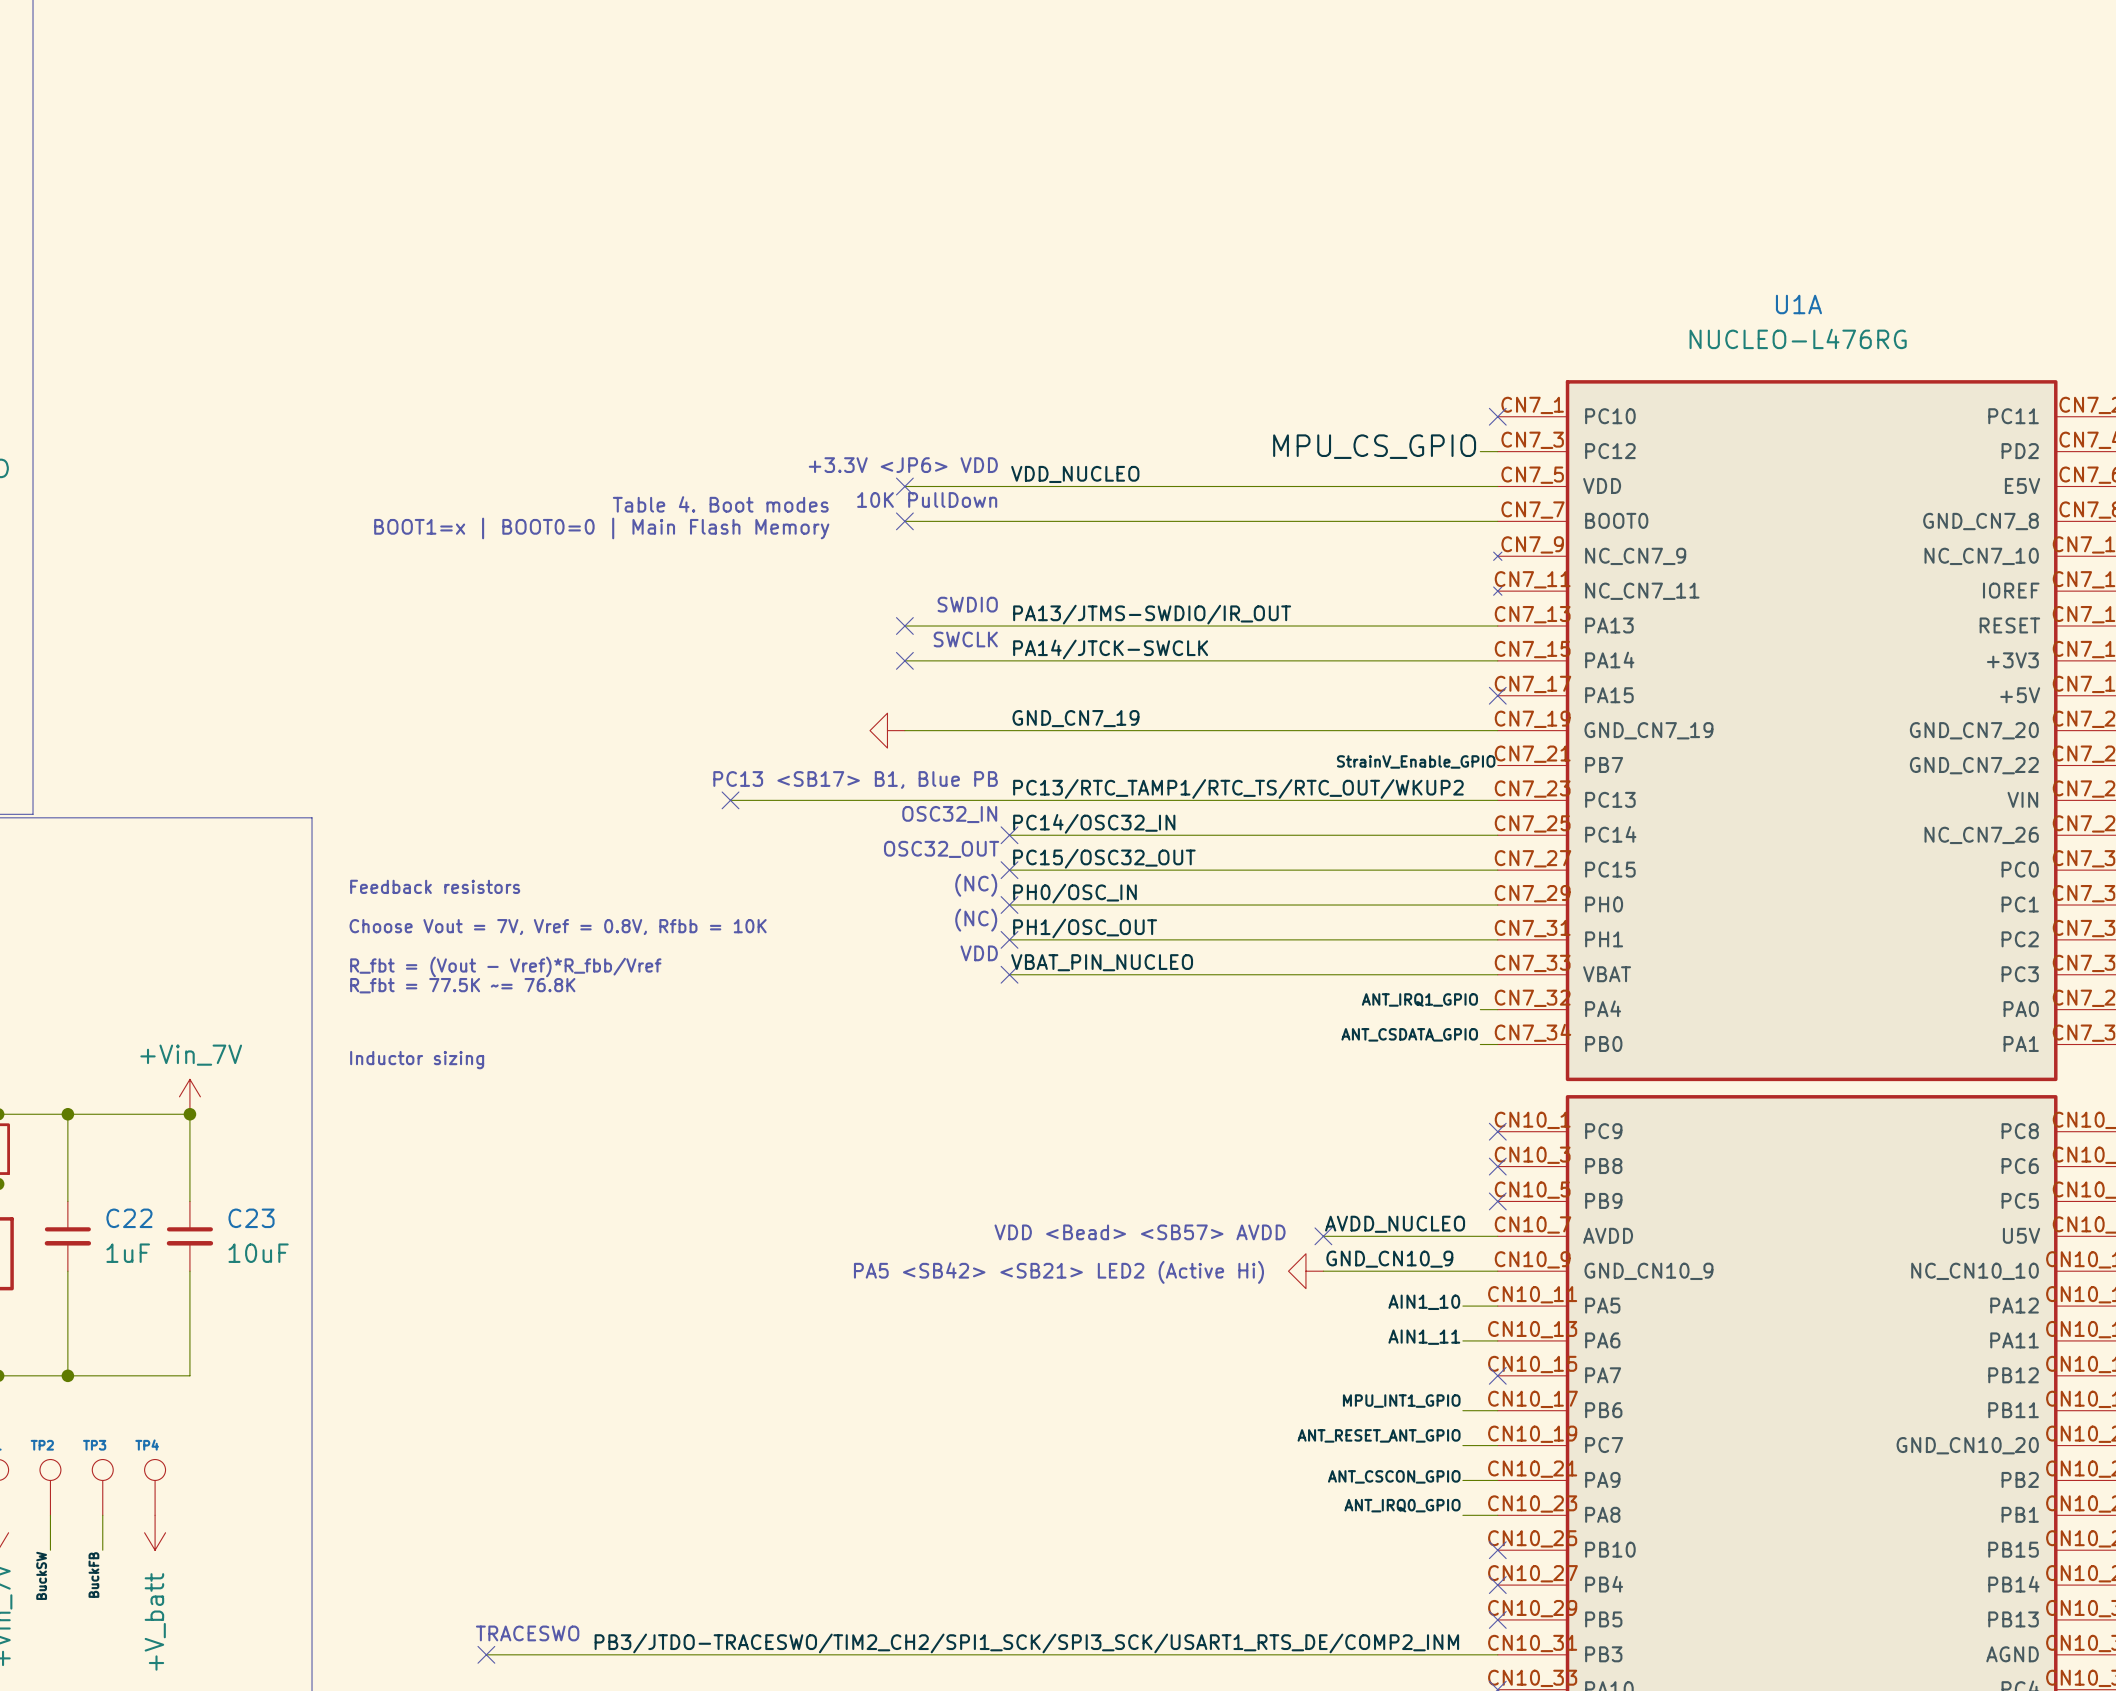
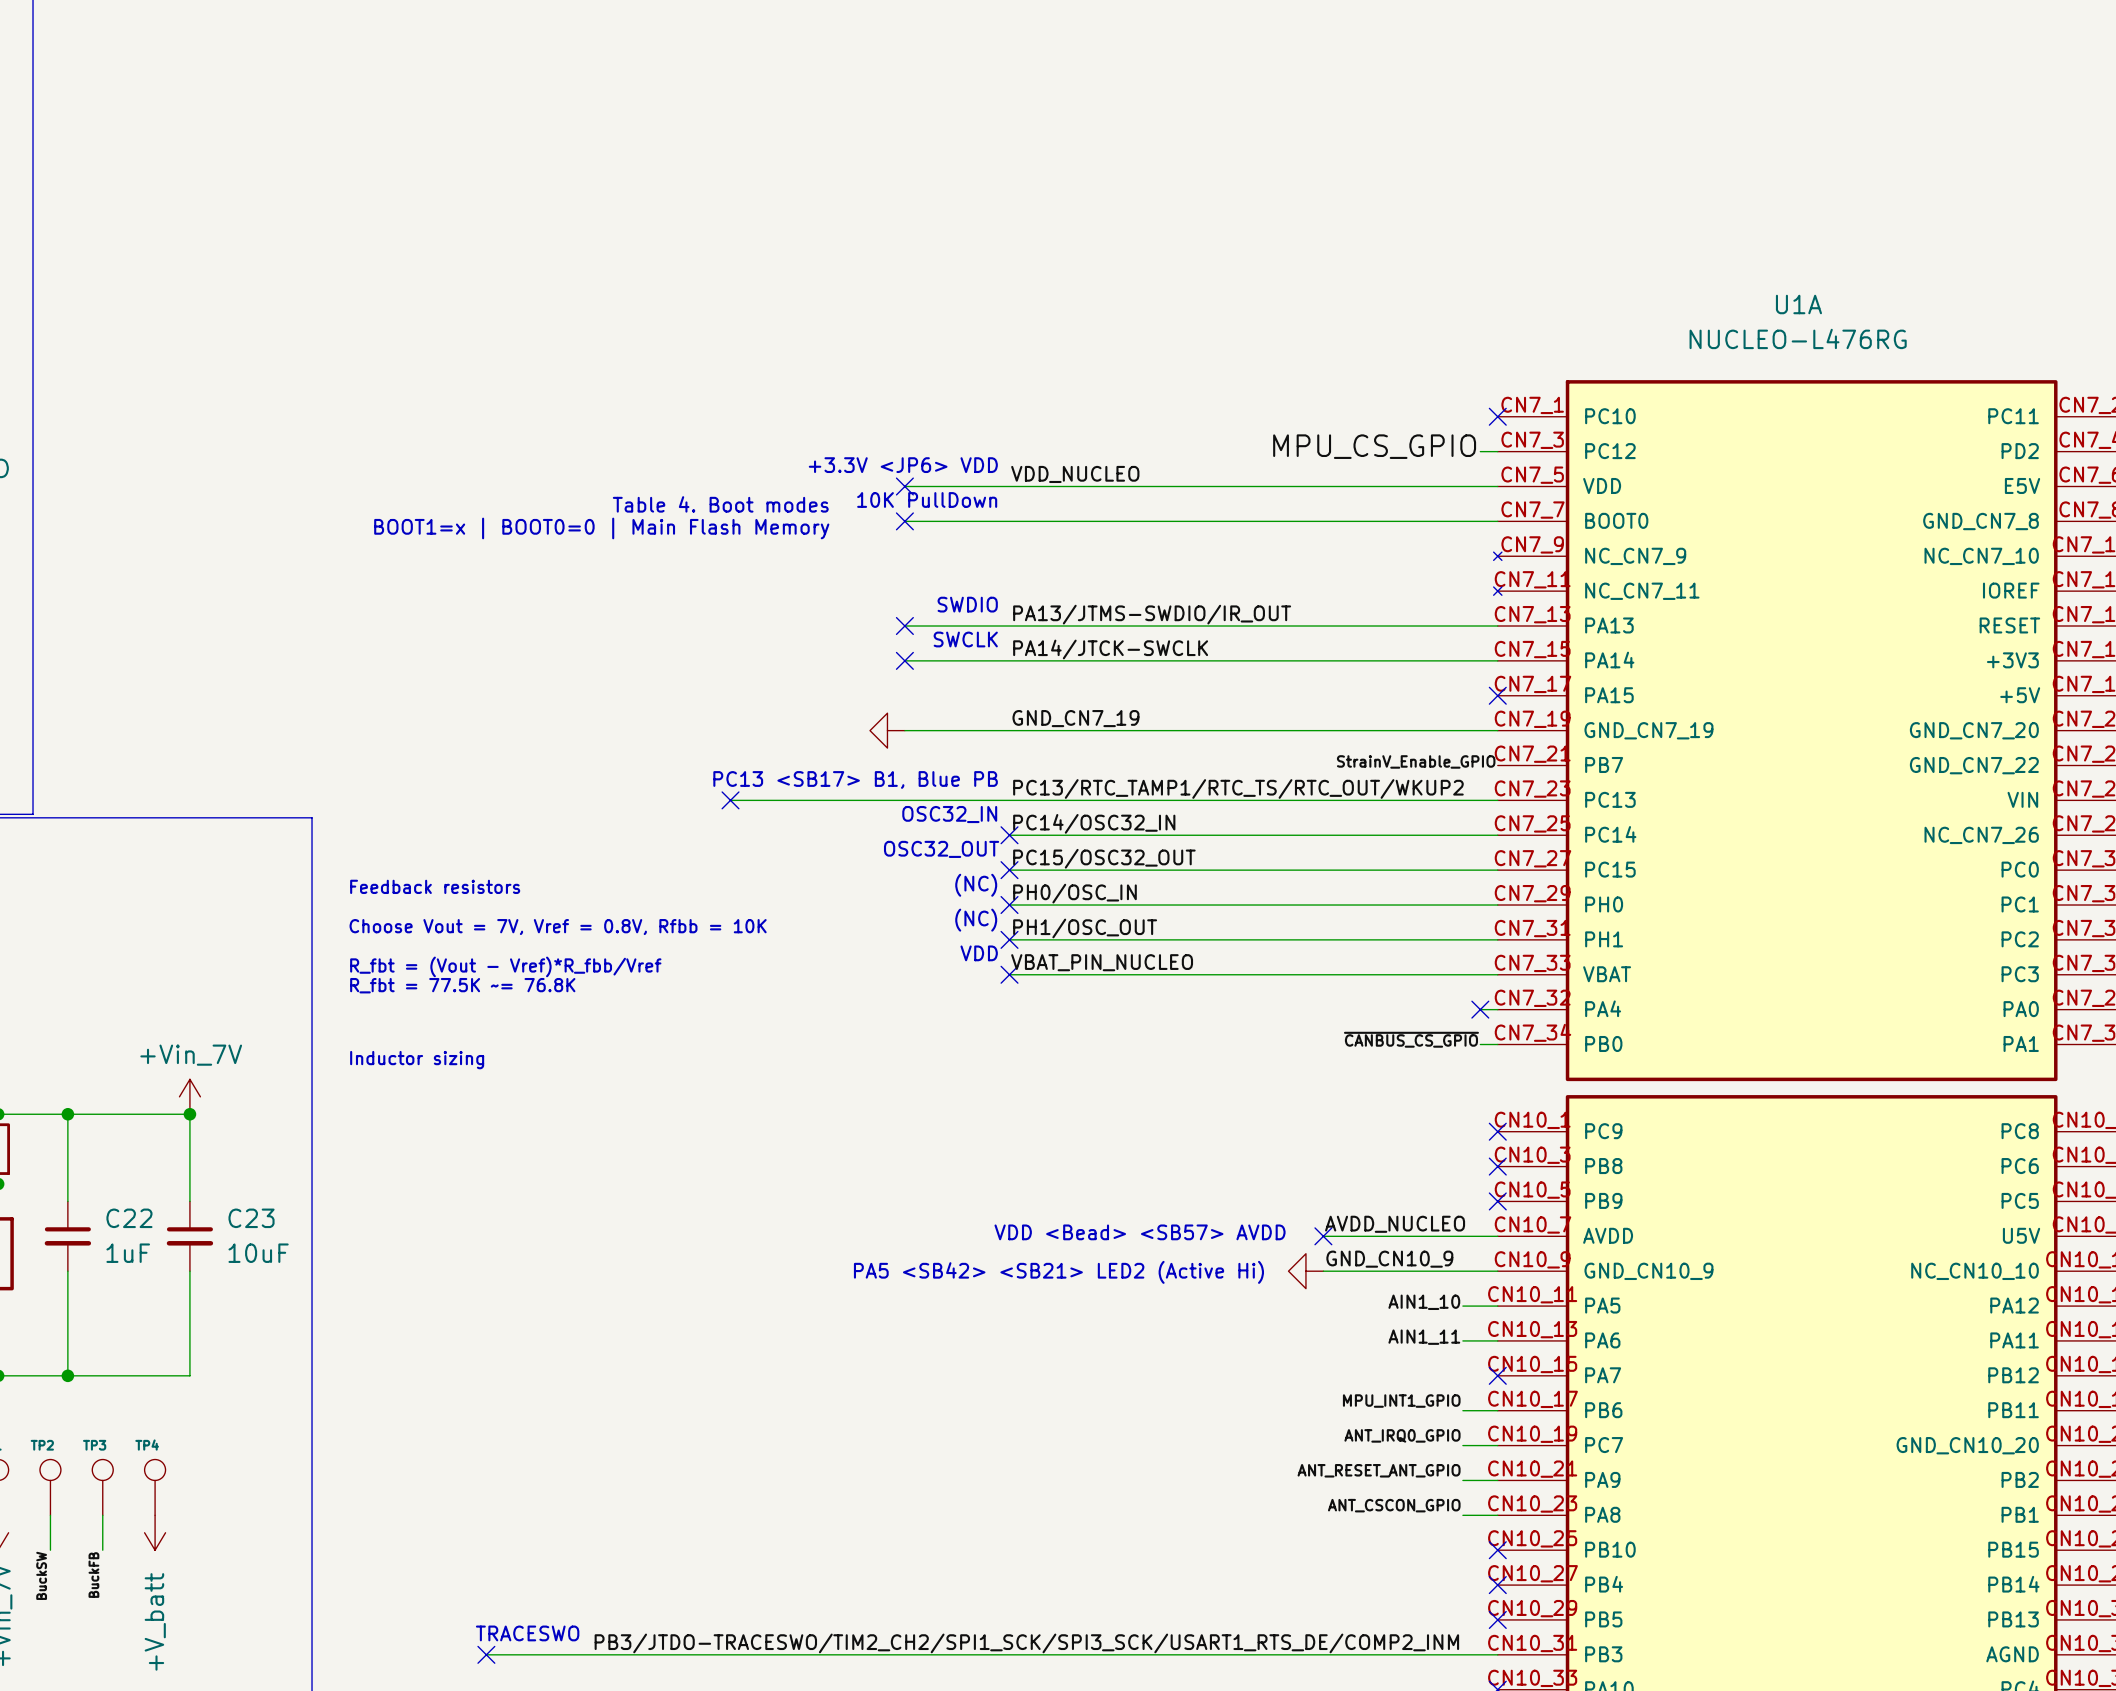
label: ANT_IRQ1_GPIO (1419, 999) -> none
no-connect mark: none -> (1480, 1009)
label: ANT_CSDATA_GPIO (1409, 1034) -> ~{CANBUS_CS_GPIO} (1411, 1039)
label: ANT_RESET_ANT_GPIO (1379, 1435) -> ANT_IRQ0_GPIO (1402, 1435)
label: ANT_CSCON_GPIO (1394, 1476) -> ANT_RESET_ANT_GPIO (1379, 1470)
label: ANT_IRQ0_GPIO (1402, 1505) -> ANT_CSCON_GPIO (1394, 1505)

